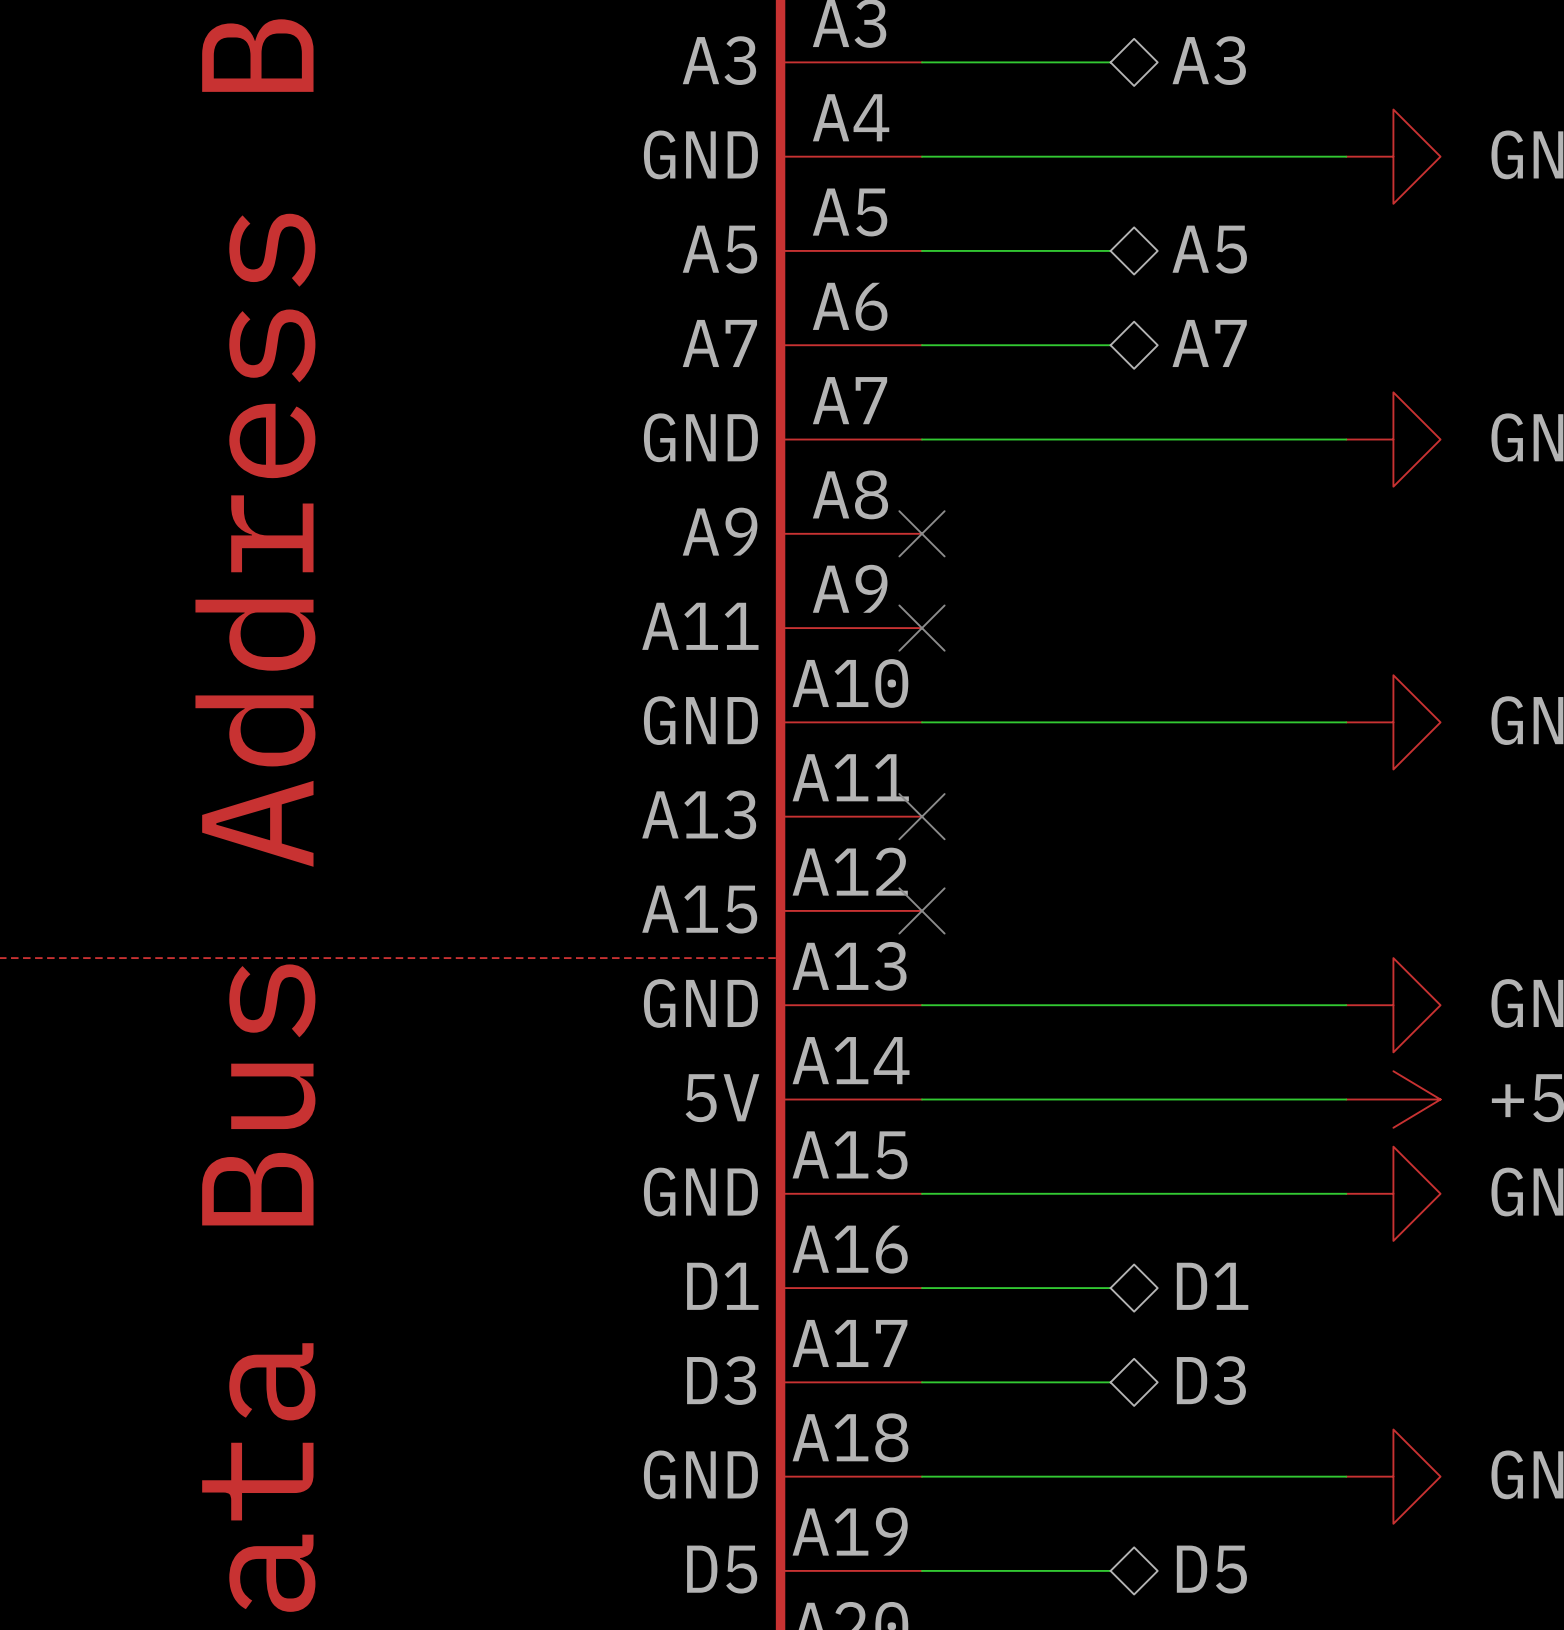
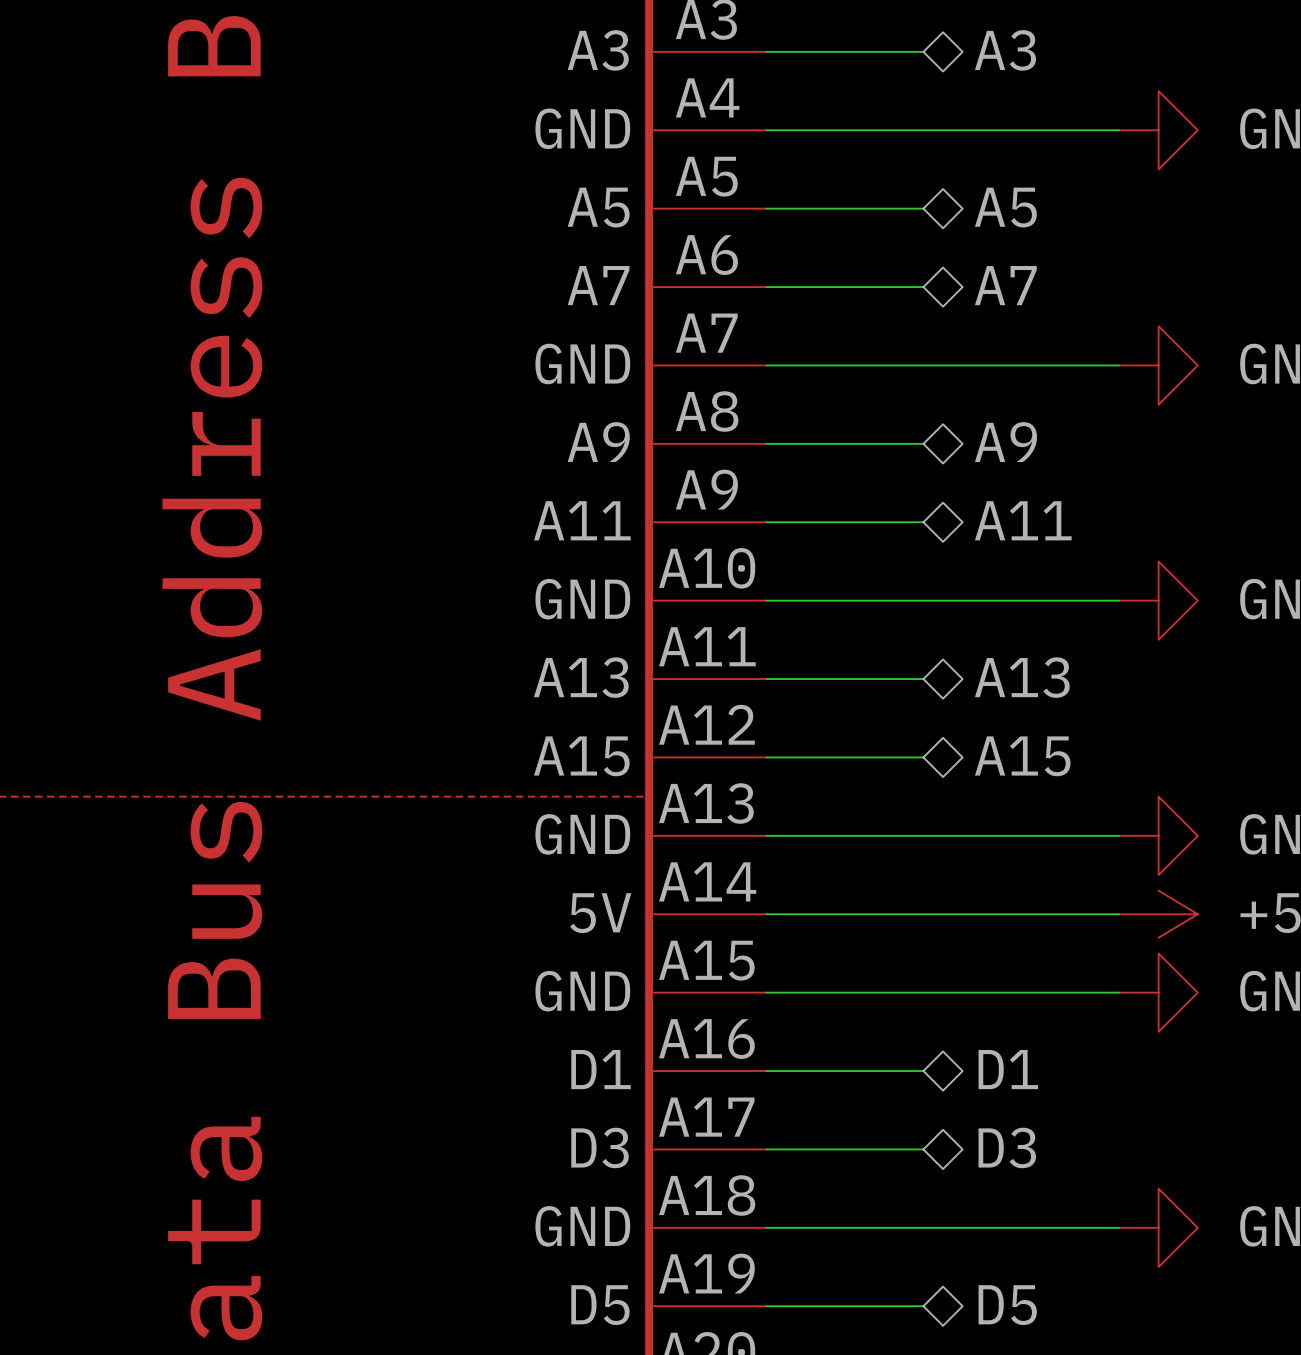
hierarchical label: none -> A9 (1005, 442)
wire: none -> (766, 443) (923, 443)
no-connect mark: (921, 533) -> none
hierarchical label: none -> A11 (1023, 520)
wire: none -> (766, 522) (923, 522)
no-connect mark: (921, 628) -> none
hierarchical label: none -> A13 (1022, 677)
wire: none -> (766, 679) (923, 679)
no-connect mark: (921, 816) -> none
hierarchical label: none -> A15 (1022, 756)
wire: none -> (766, 757) (923, 757)
no-connect mark: (921, 910) -> none

